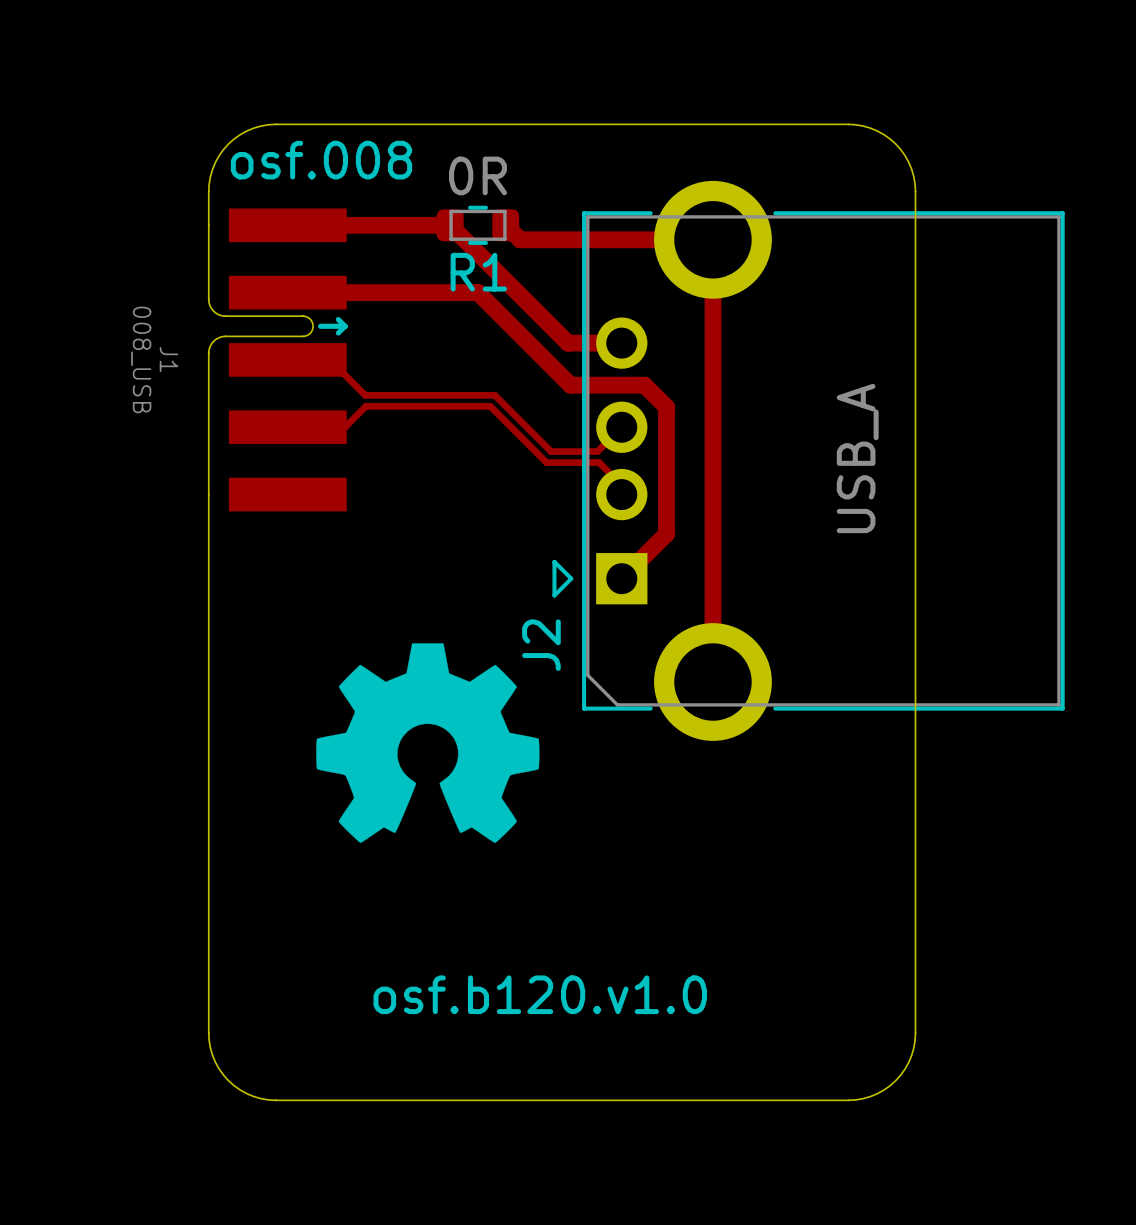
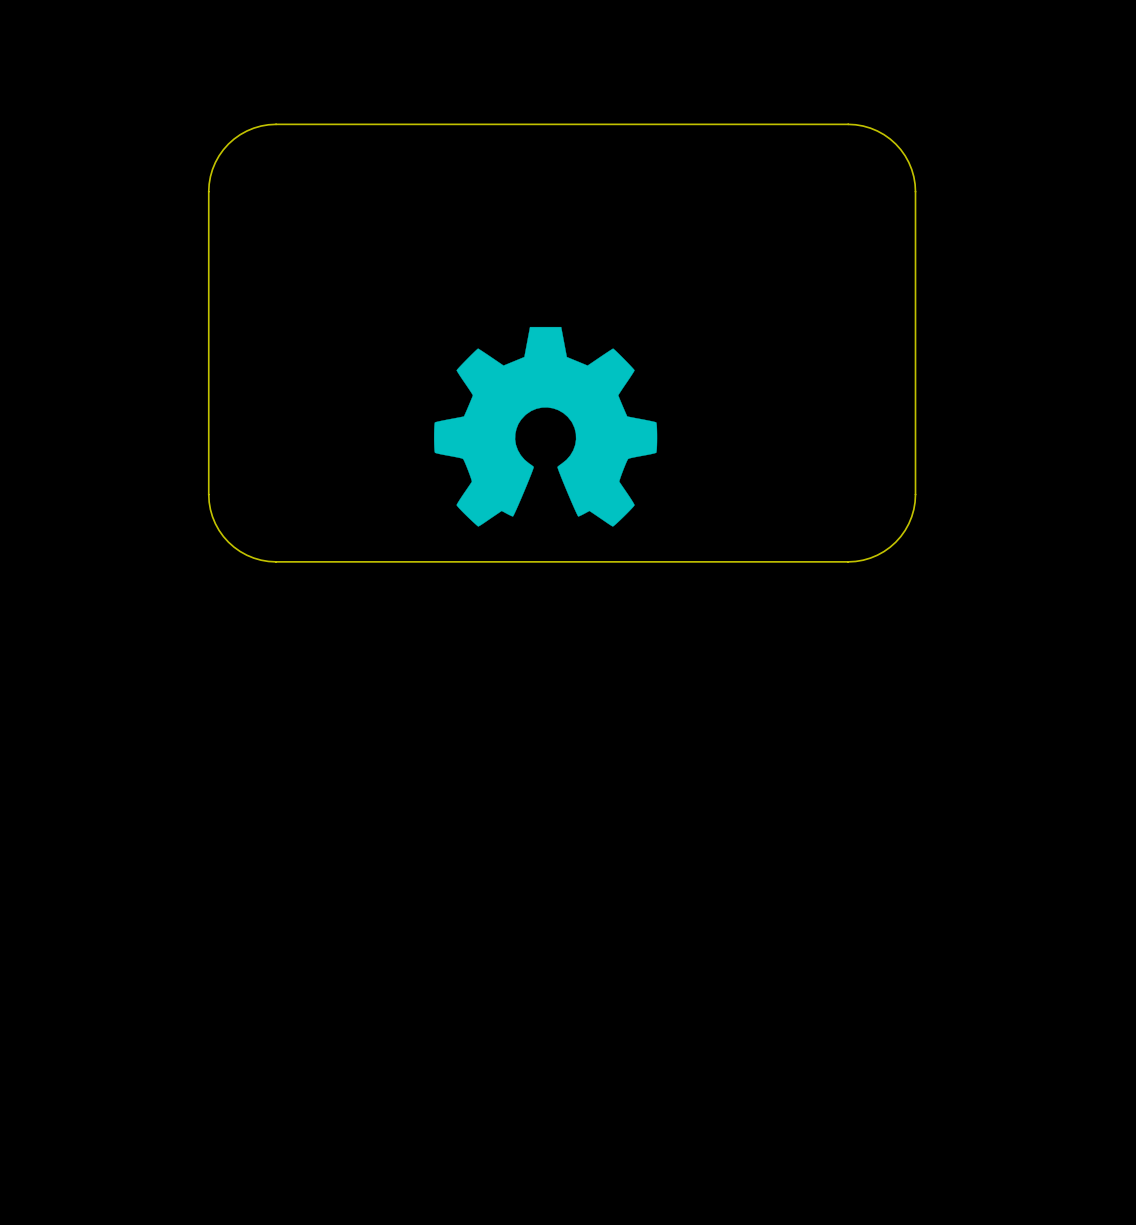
text: osf.008 (321, 160) -> none
track: (287, 225) (450, 225) (568, 343) (621, 343) -> none
R1: 0R (477, 225) -> none
track: (505, 225) (520, 239) (712, 239) (712, 682) -> none
track: (287, 292) (477, 292) (570, 385) (644, 385) (666, 407) (666, 534) (621, 578) -> none
J1: 008_USB (277, 359) -> none
track: (287, 359) (329, 359) (365, 395) (494, 395) (551, 451) (597, 451) (621, 427) -> none
track: (287, 427) (345, 427) (366, 406) (490, 406) (546, 462) (599, 462) (621, 485) (621, 494) -> none
J2: USB_A (808, 460) -> none
board edge: (208, 494) (209, 1040) (212, 1055) (219, 1068) (234, 1085) (253, 1096) (276, 1100) (848, 1100) (863, 1098) (877, 1093) (895, 1080) (908, 1062) (913, 1048) (915, 1033) (915, 494) -> (208, 225) (209, 502) (215, 523) (223, 536) (240, 551) (253, 558) (276, 561) (855, 561) (877, 555) (890, 547) (900, 536) (911, 516) (915, 494)
drawing position: (427, 743) -> (545, 426)
text: osf.b120.v1.0 (540, 994) -> none

